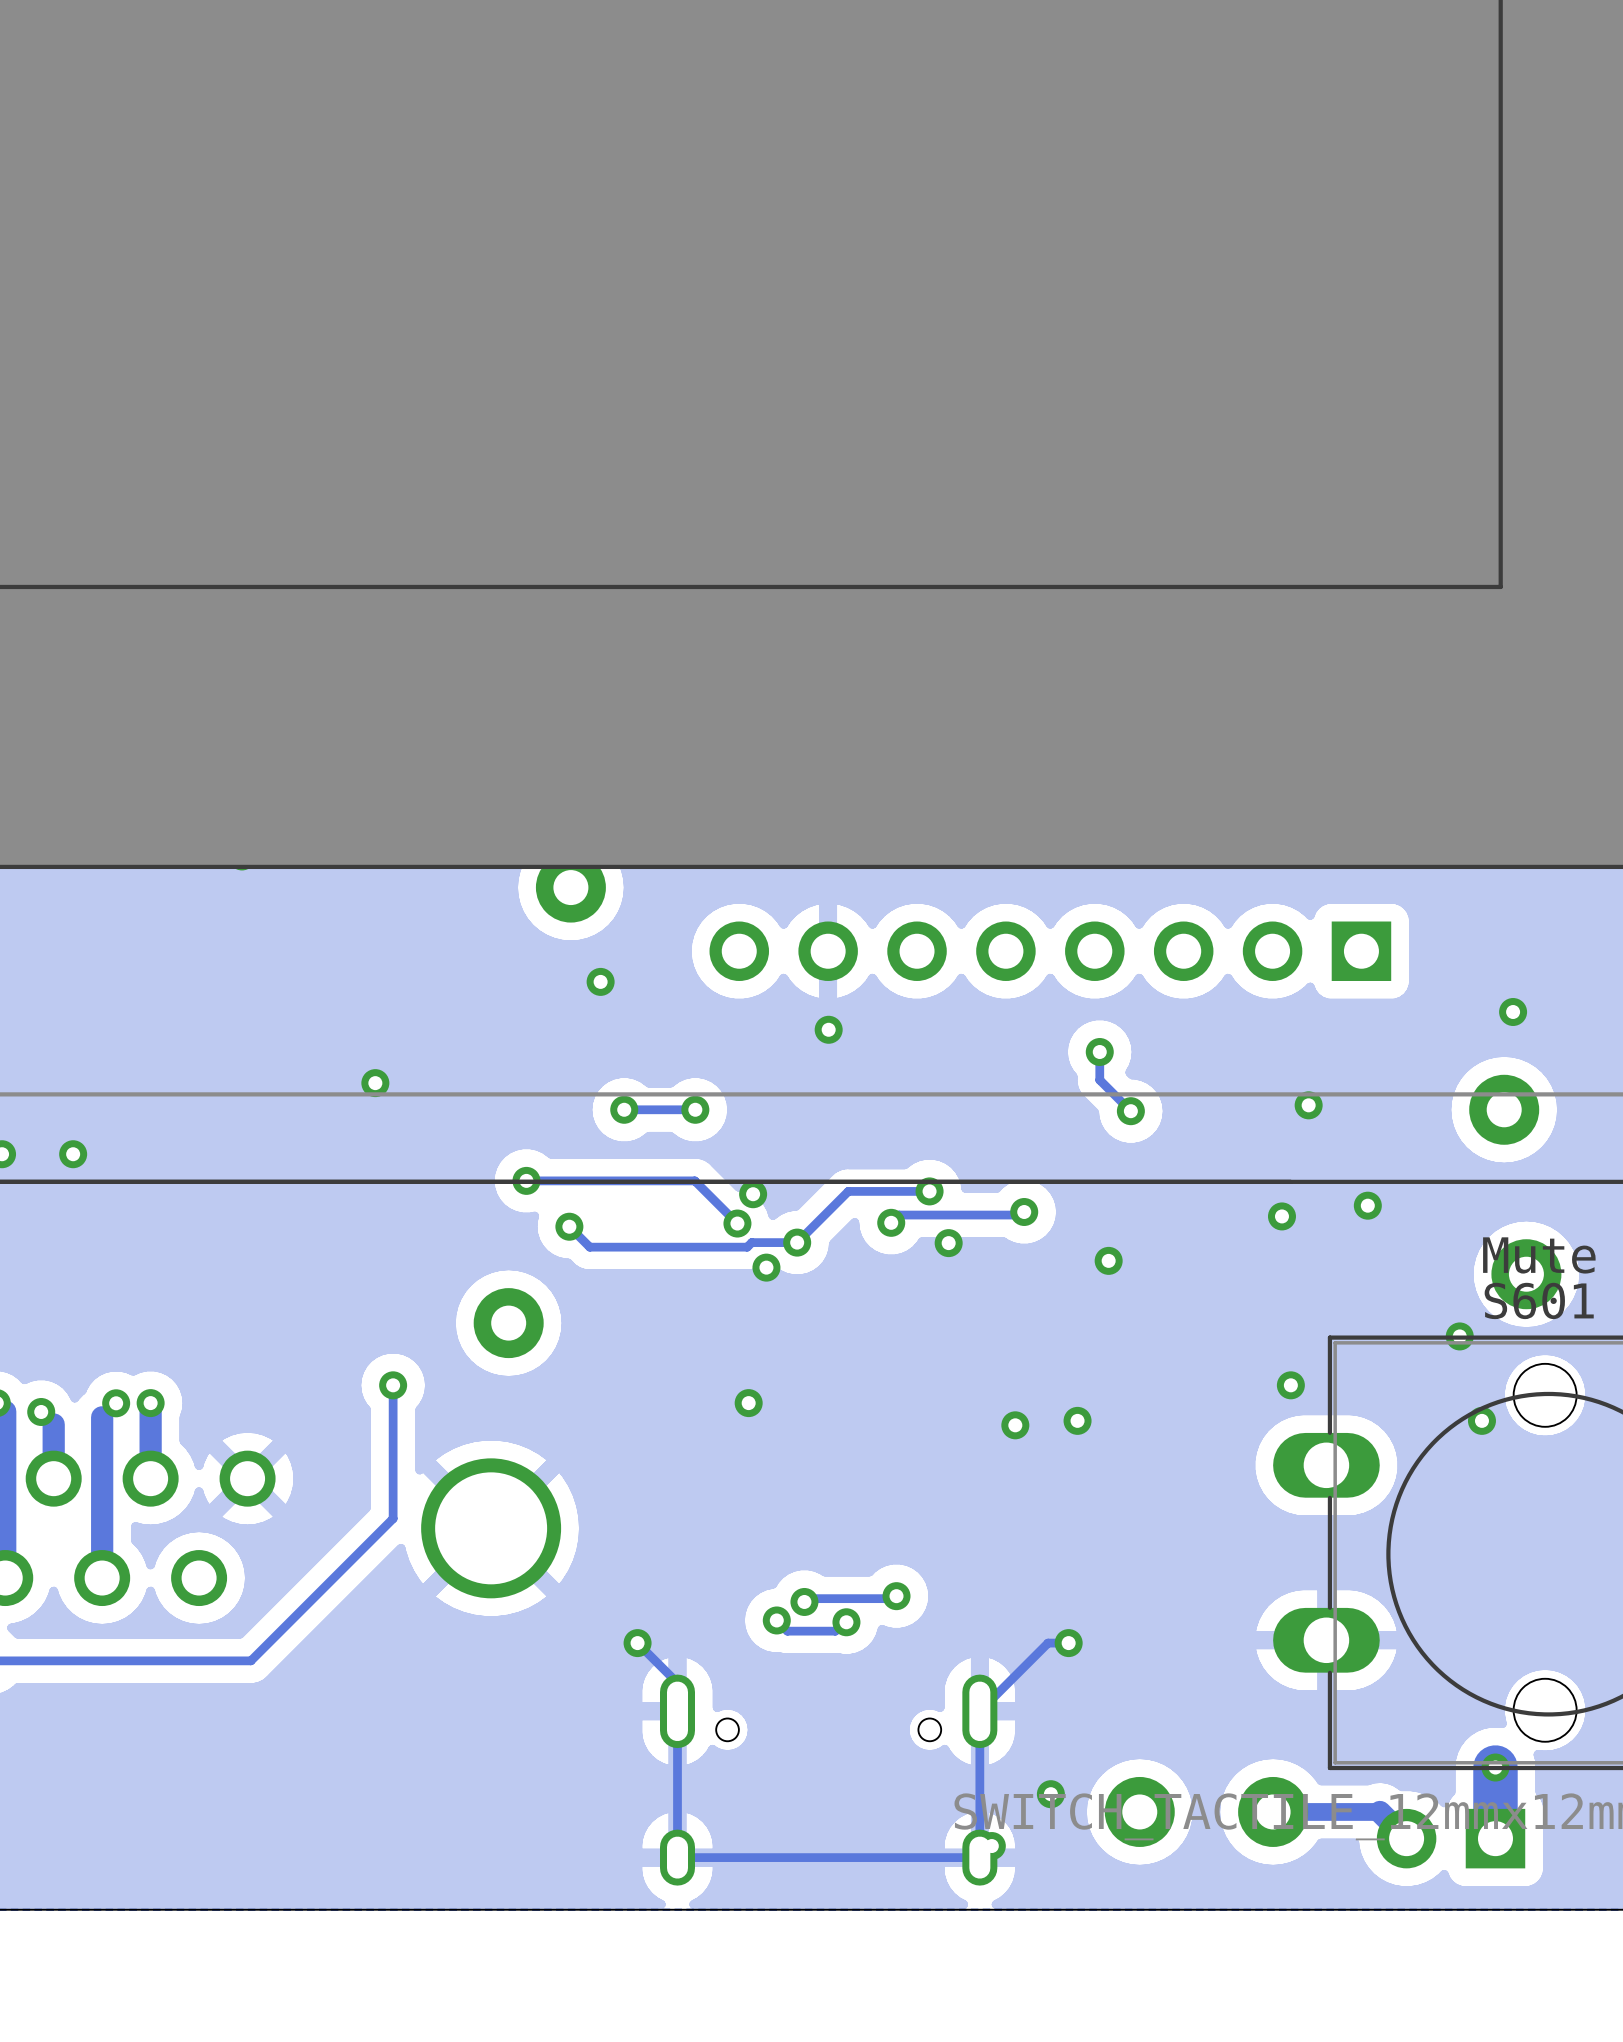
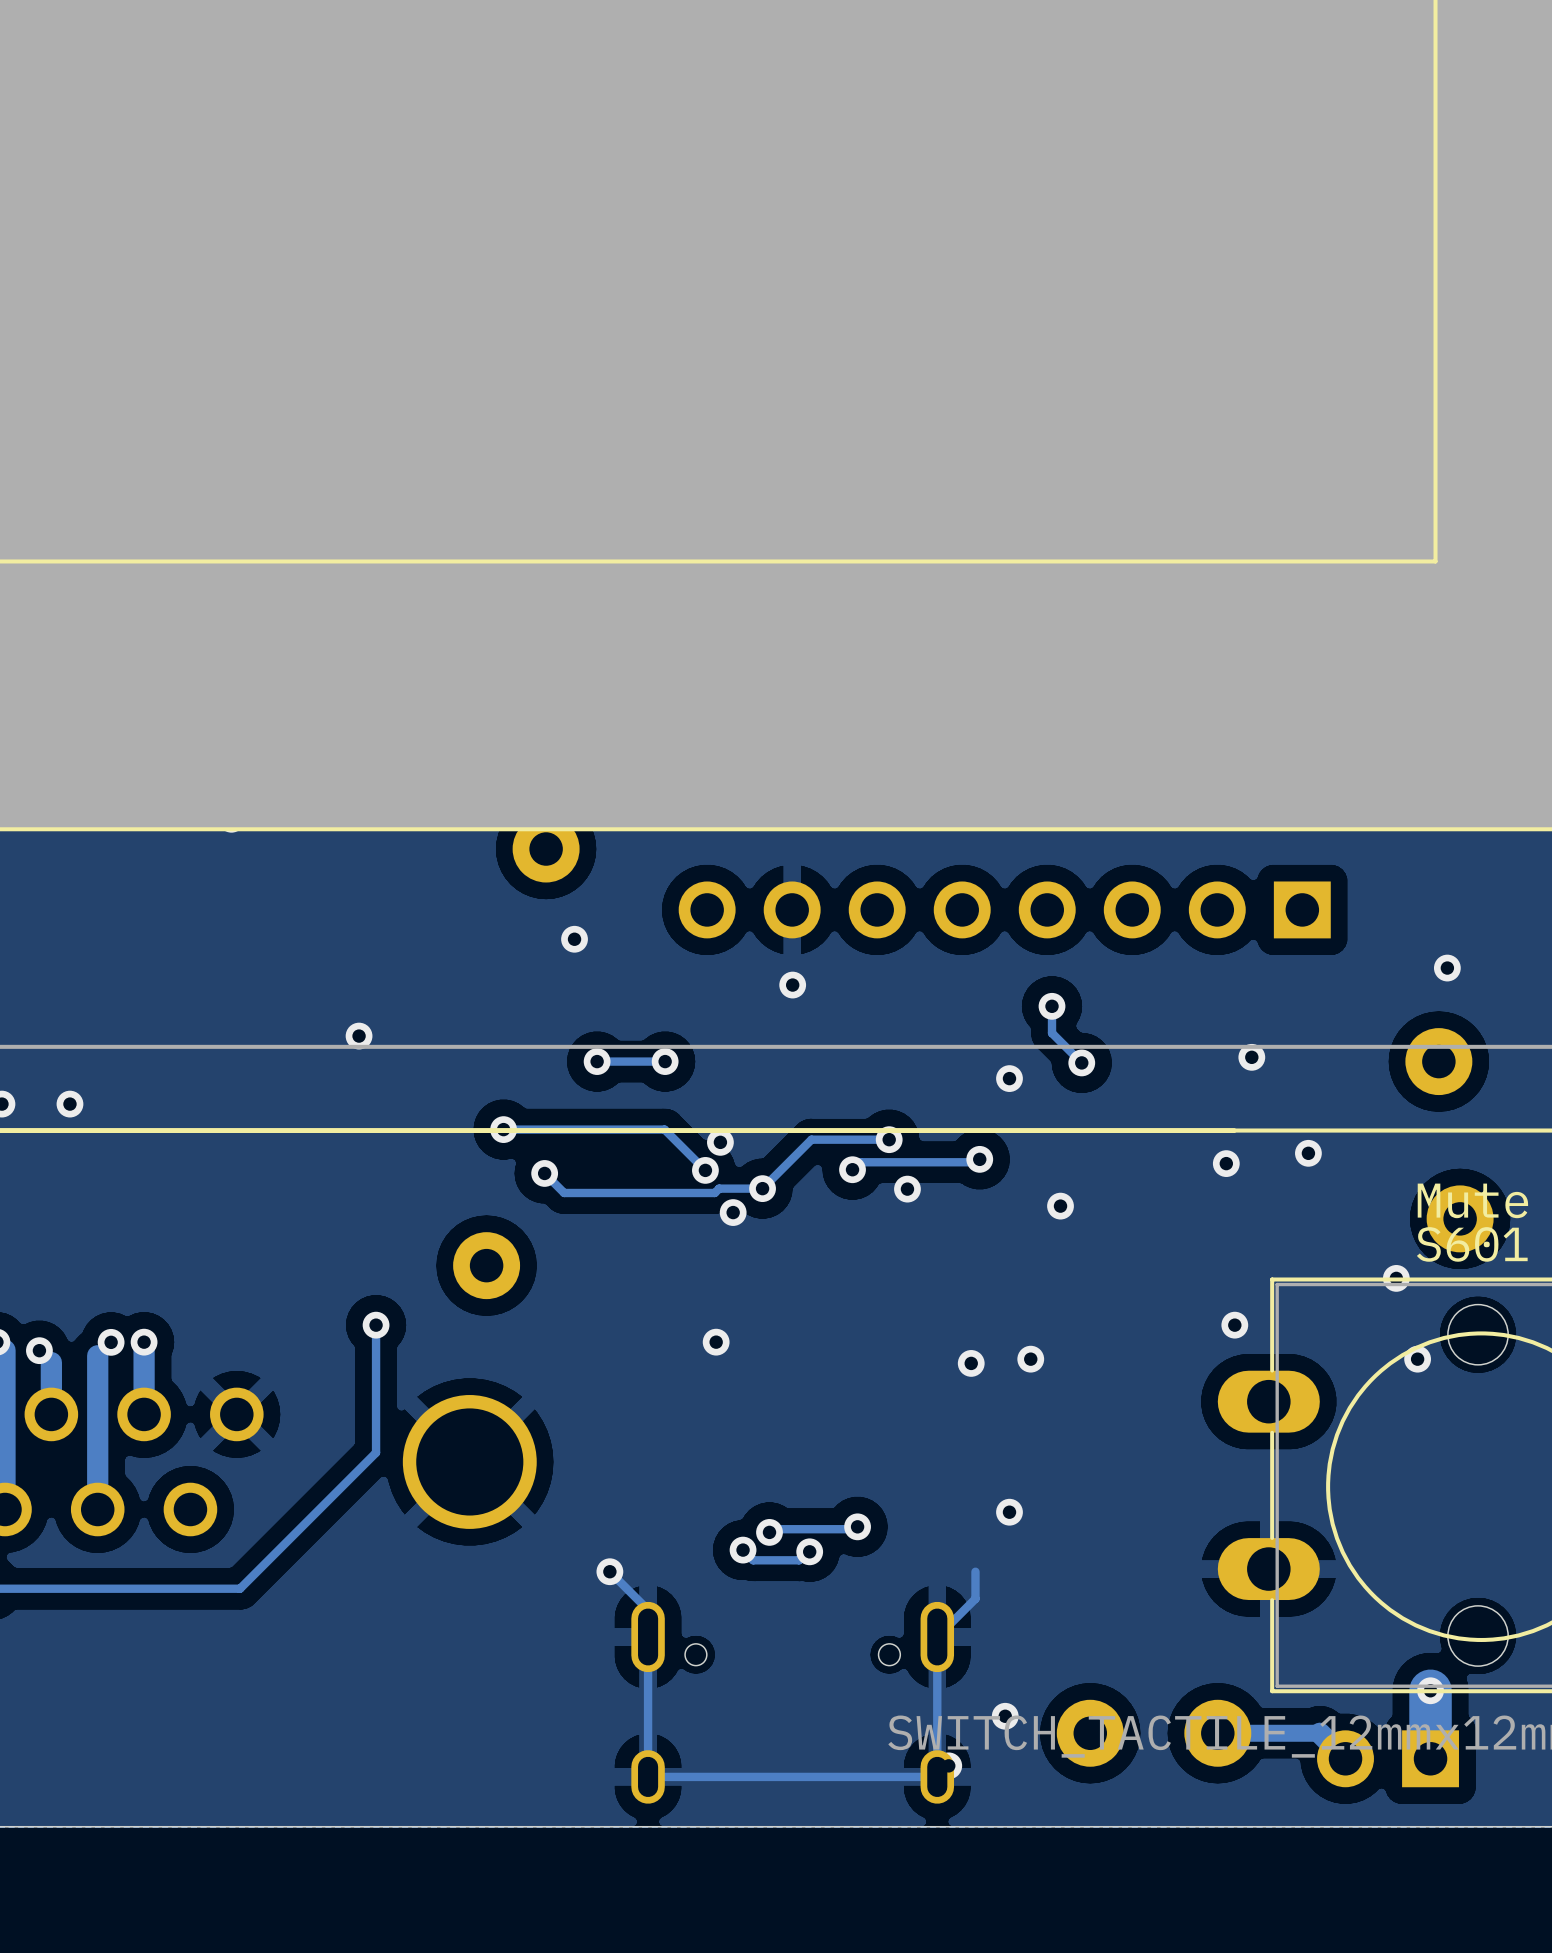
via: none -> (1009, 1078)
track: (1068, 1643) (1048, 1643) (1019, 1671) -> (975, 1571) (975, 1598)
via position: (1068, 1643) -> (1009, 1512)

